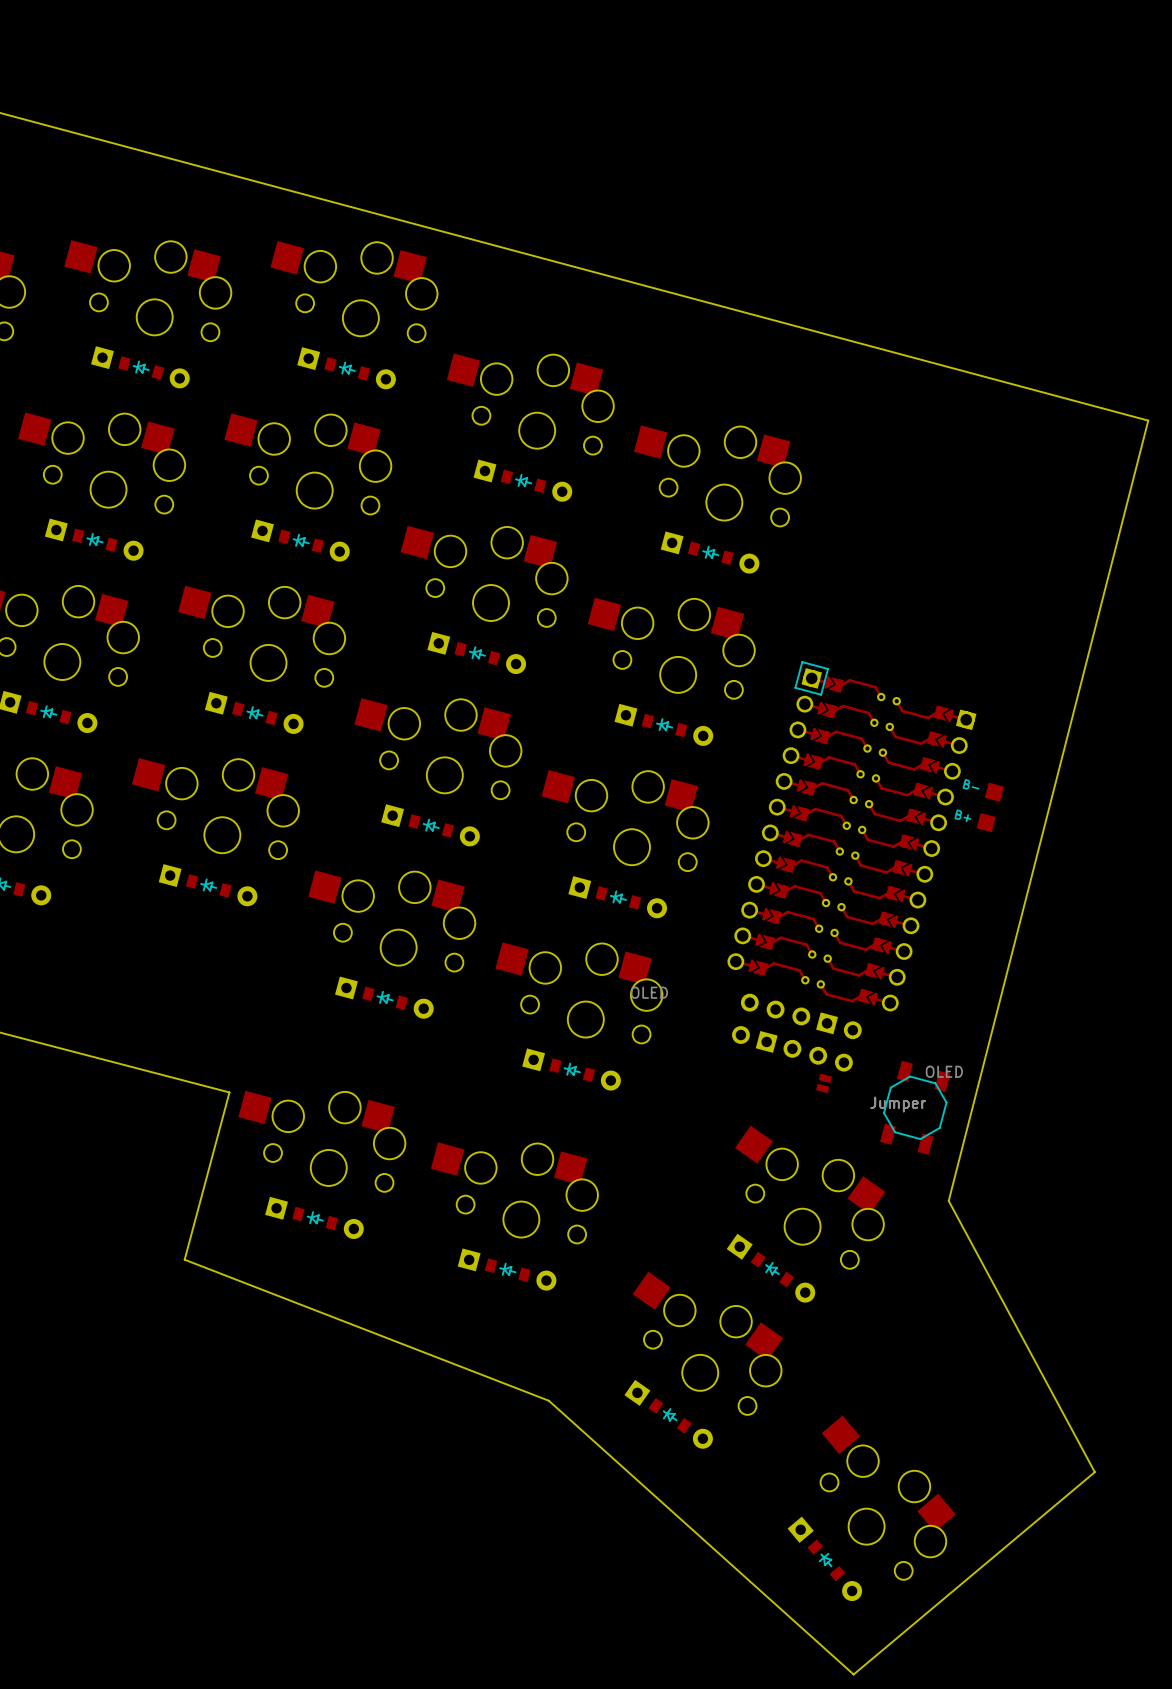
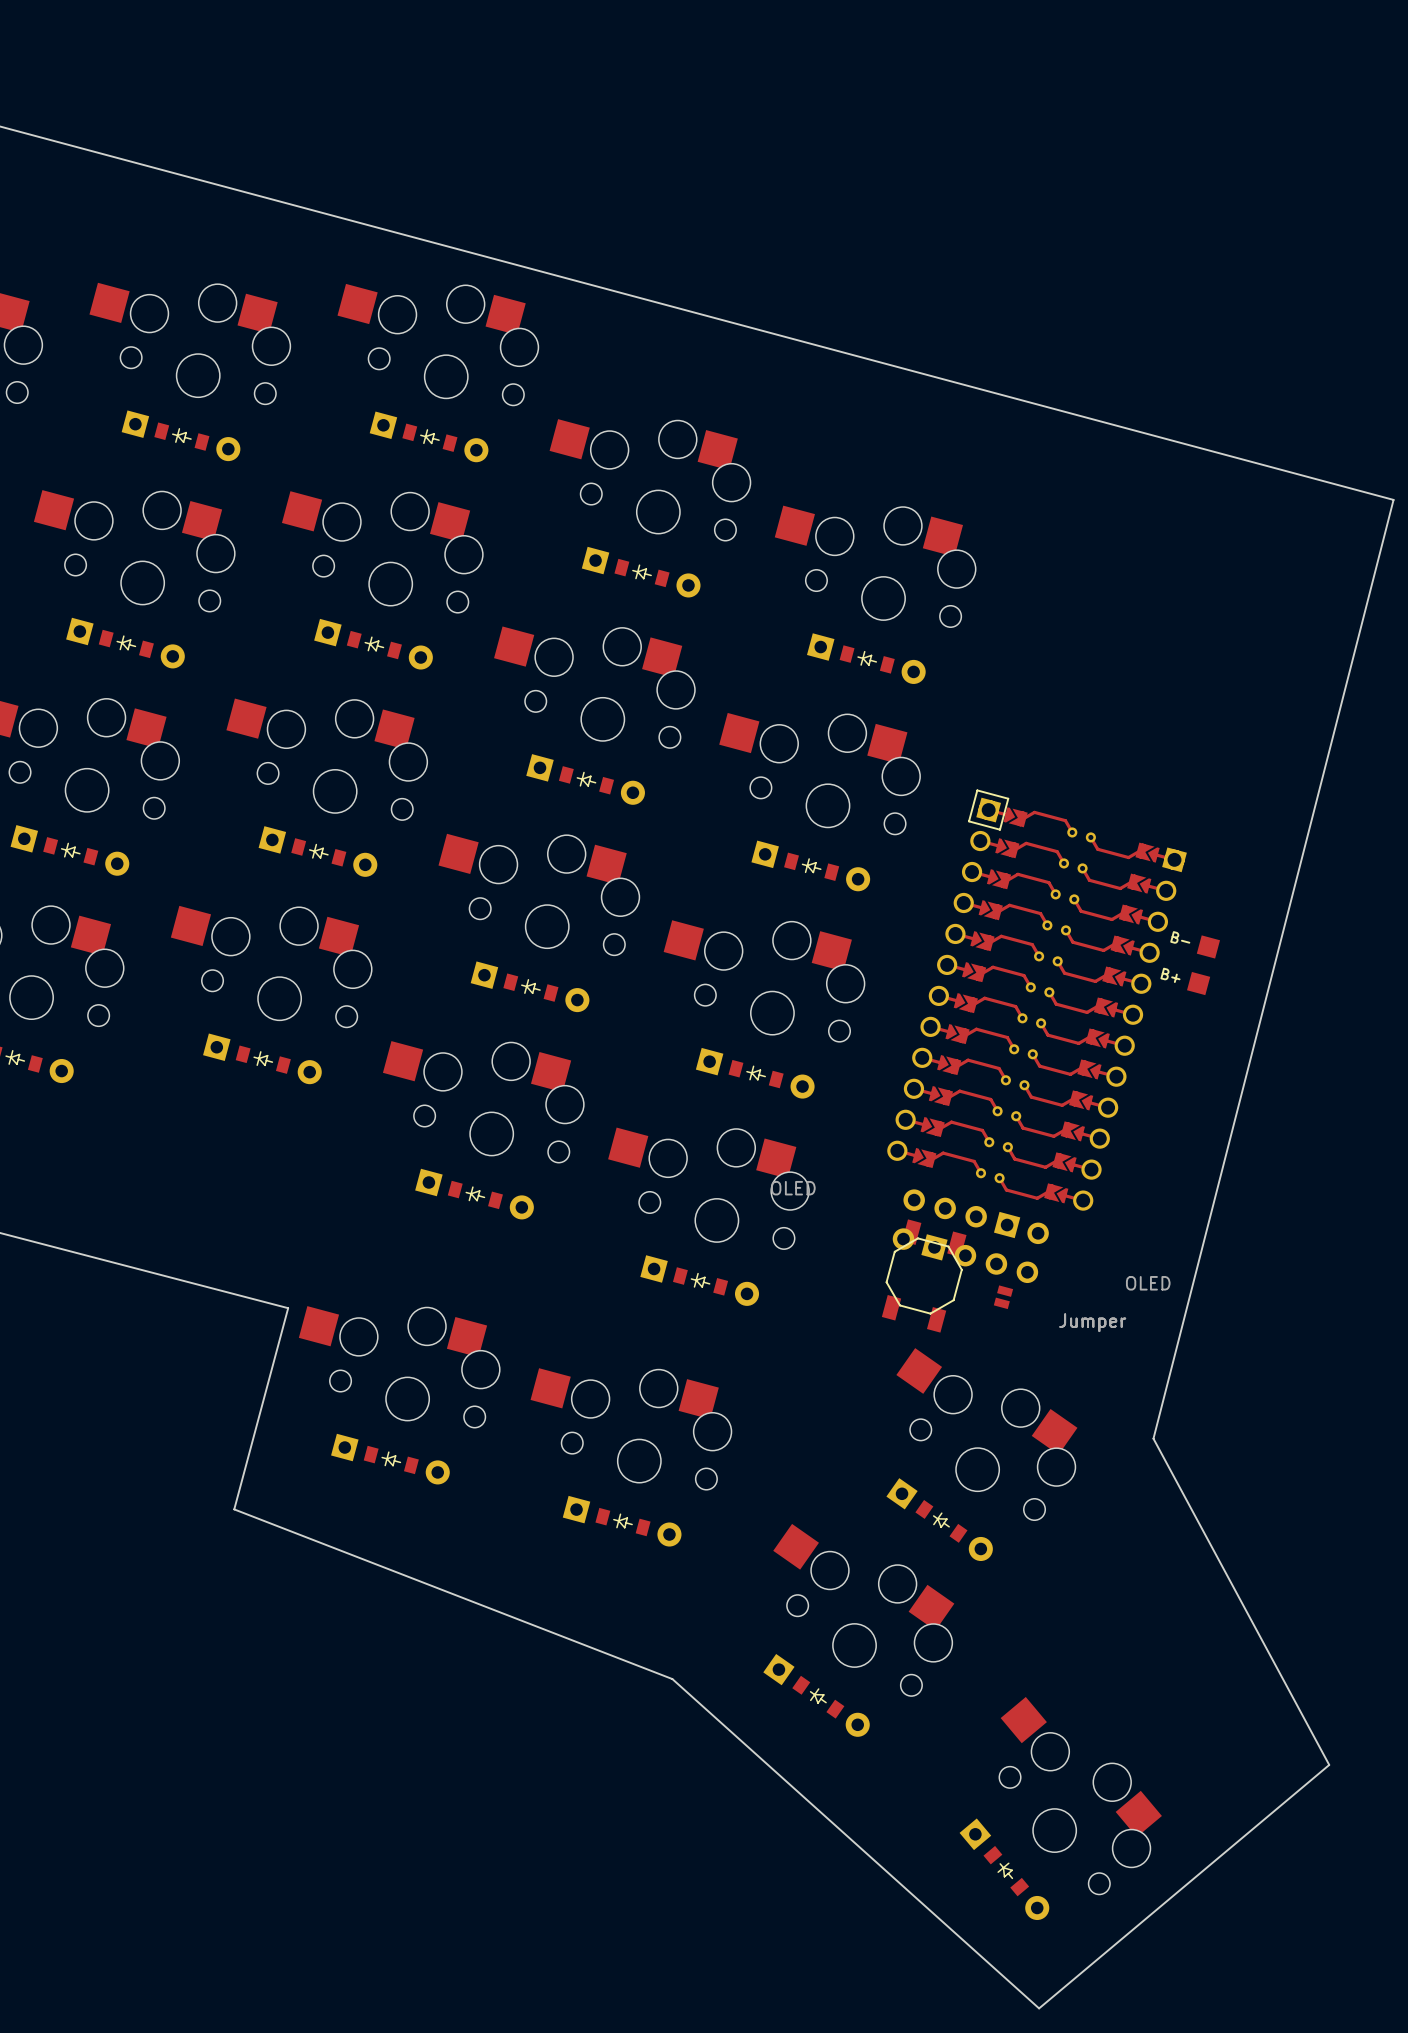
part position: (915, 1107) -> (924, 1276)

